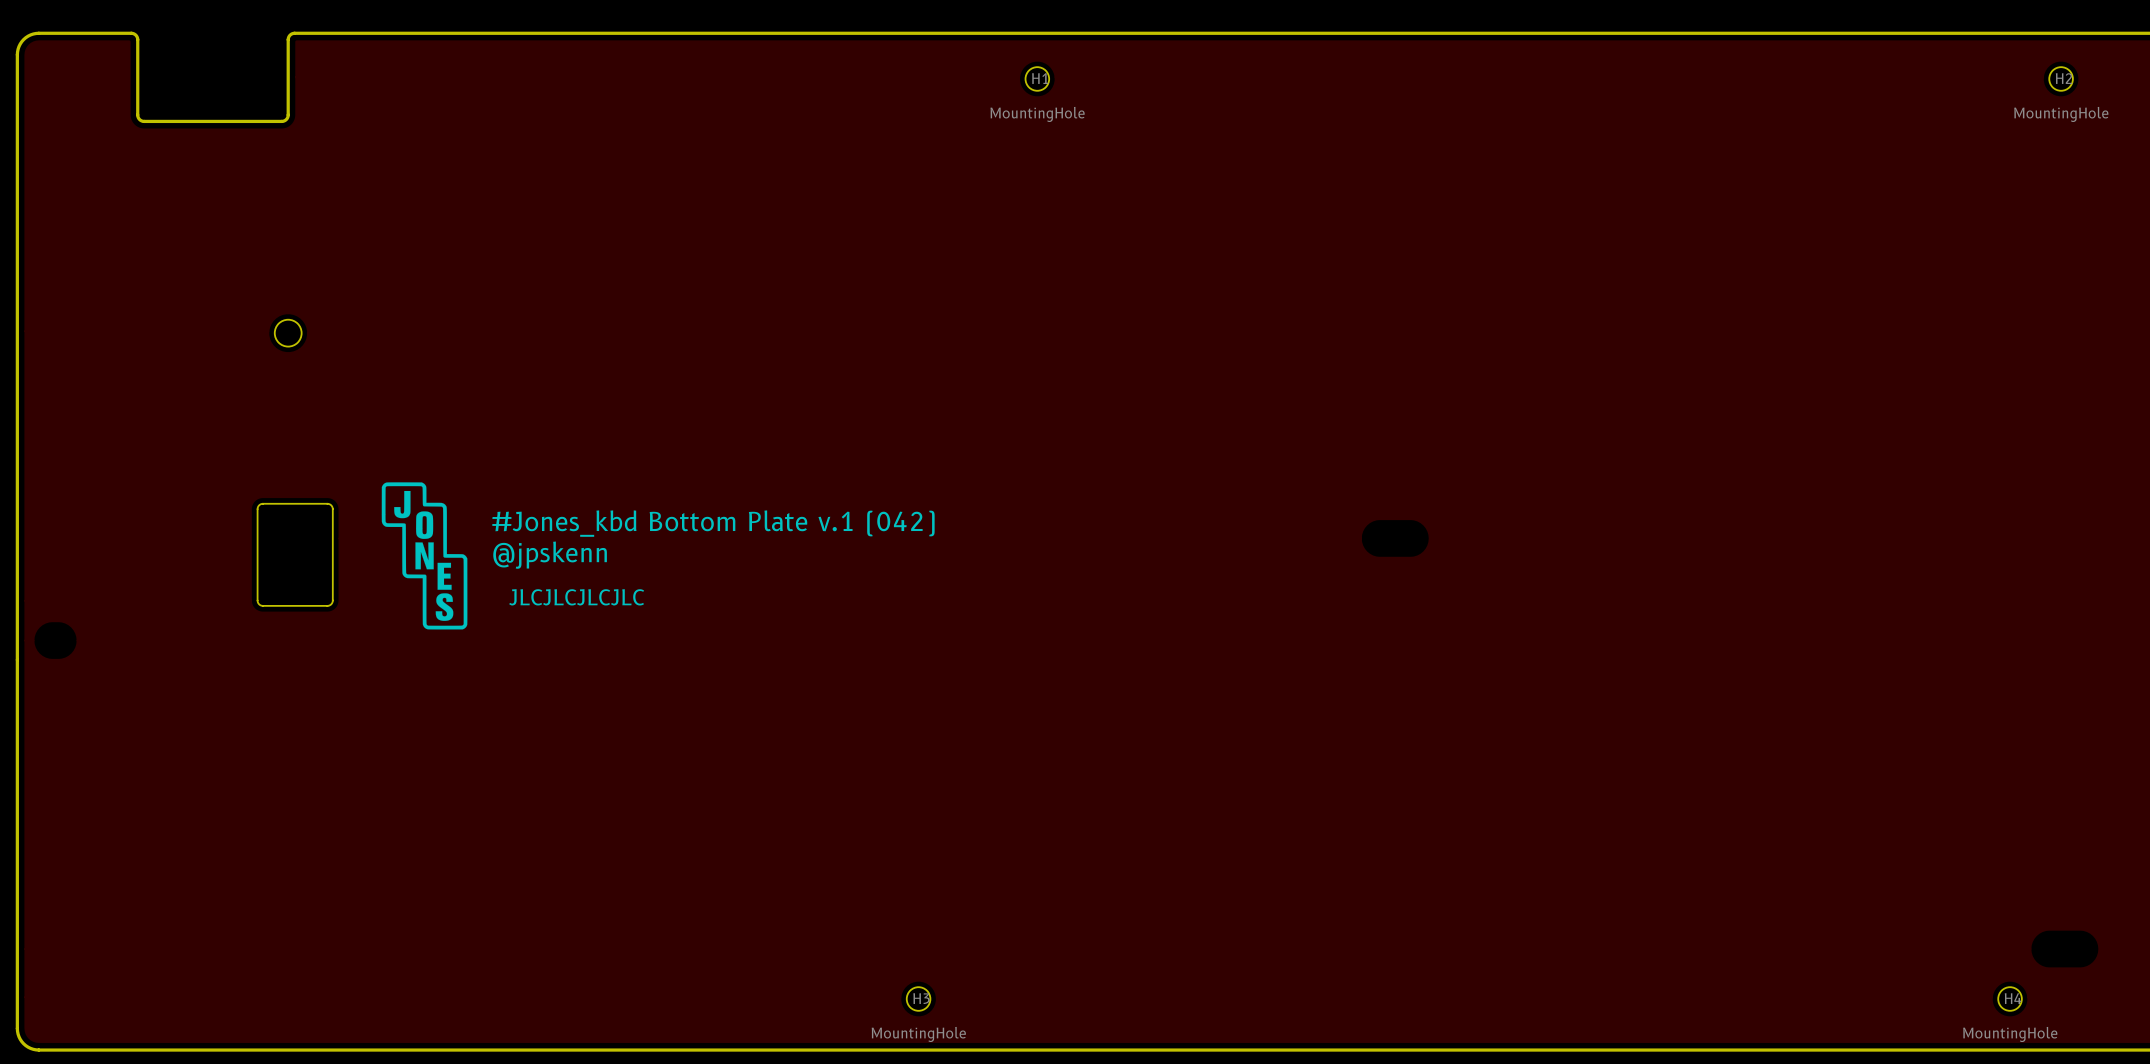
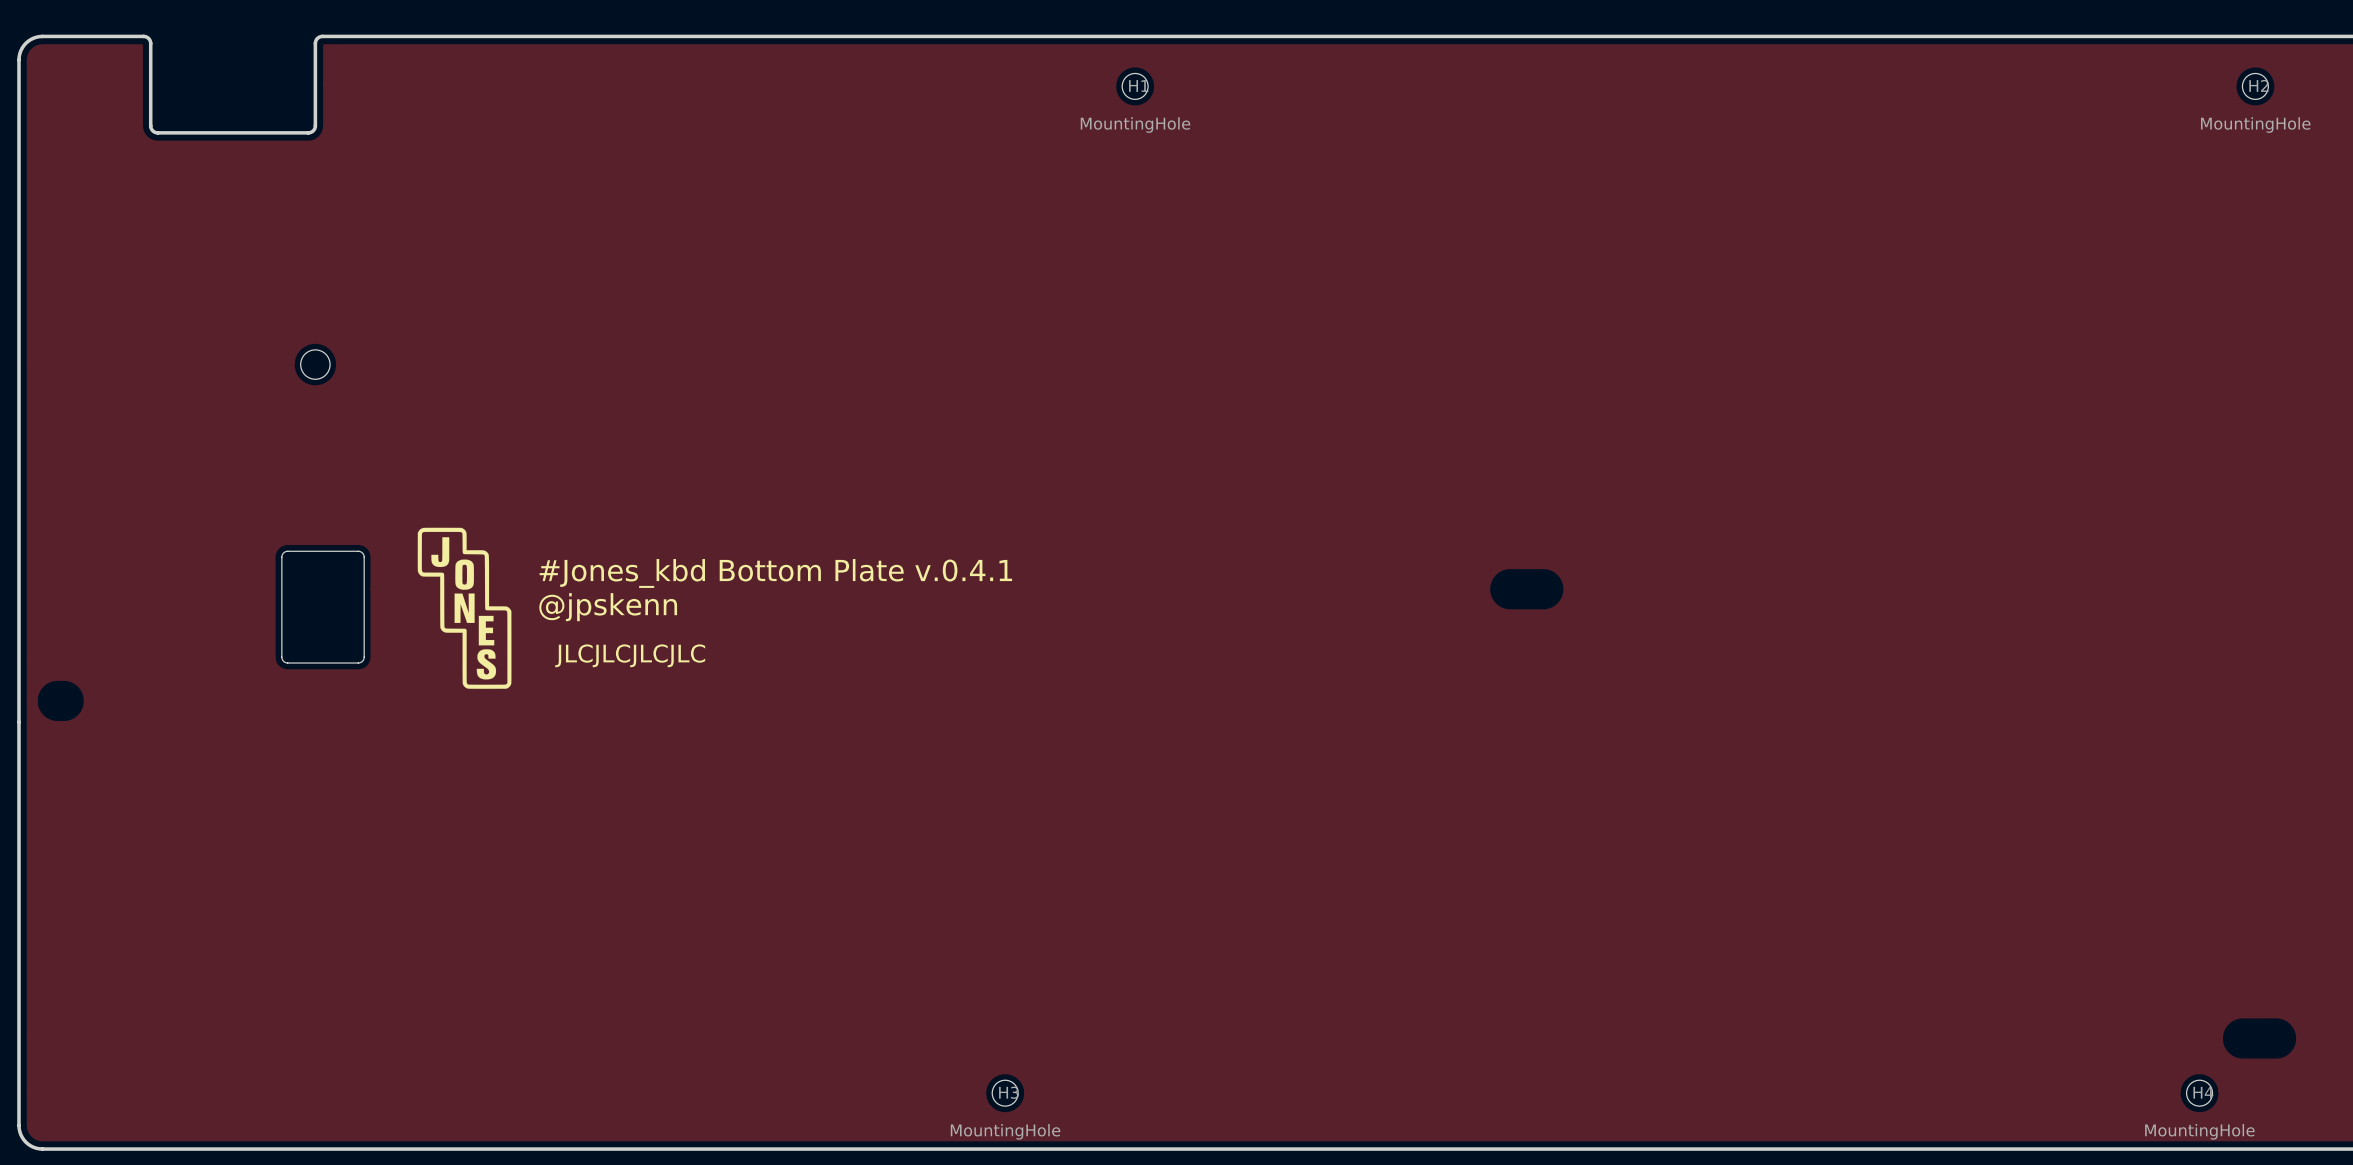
text: #Jones_kbd Bottom Plate v.1 (042) (713, 523) -> #Jones_kbd Bottom Plate v.0.4.1 (775, 573)

